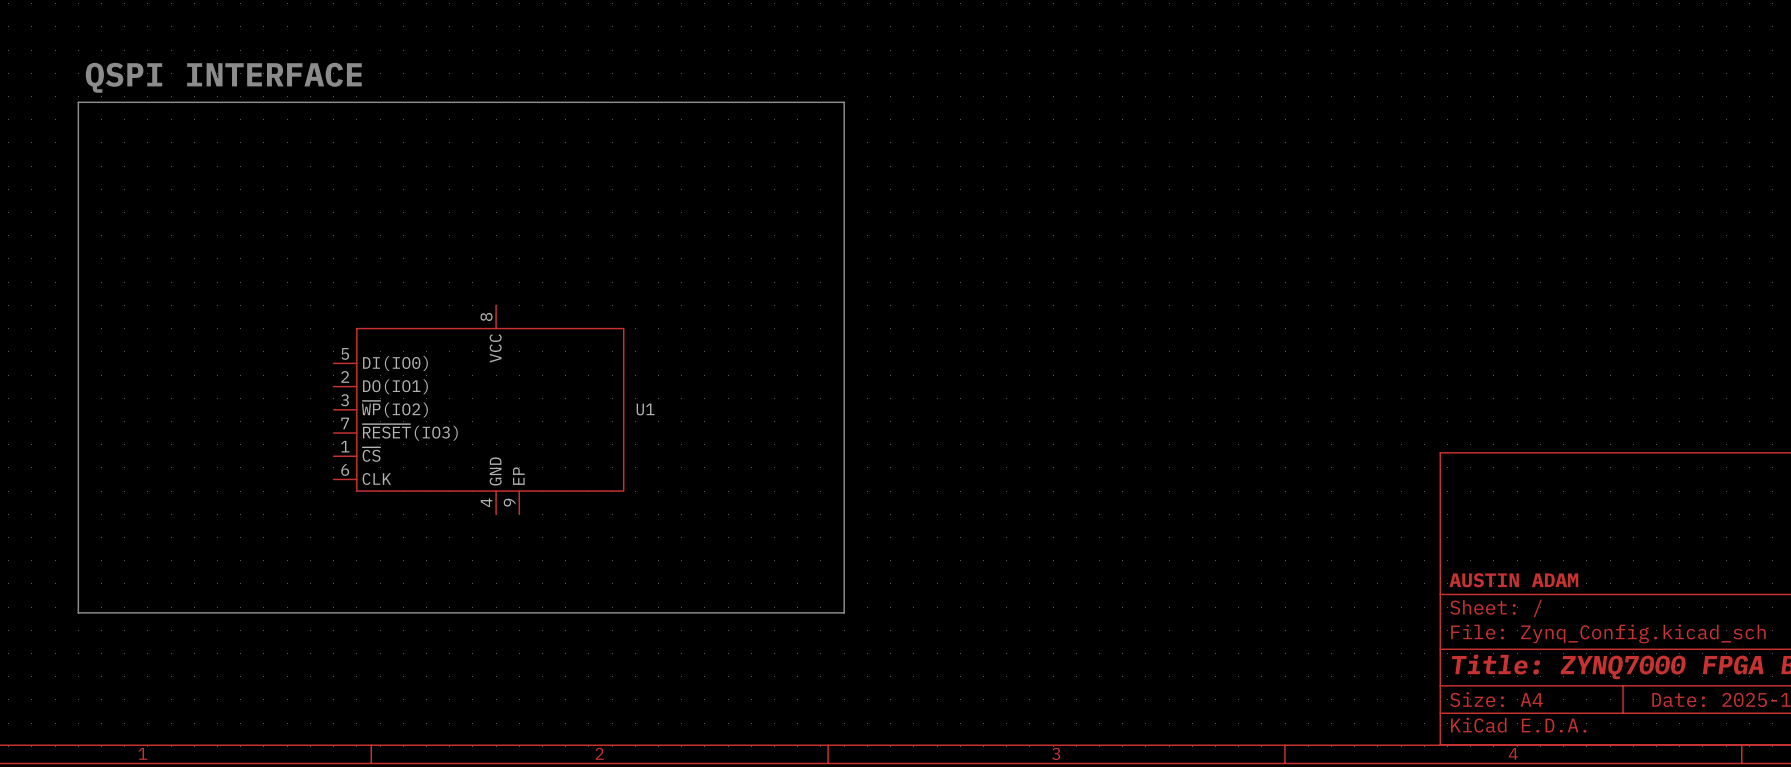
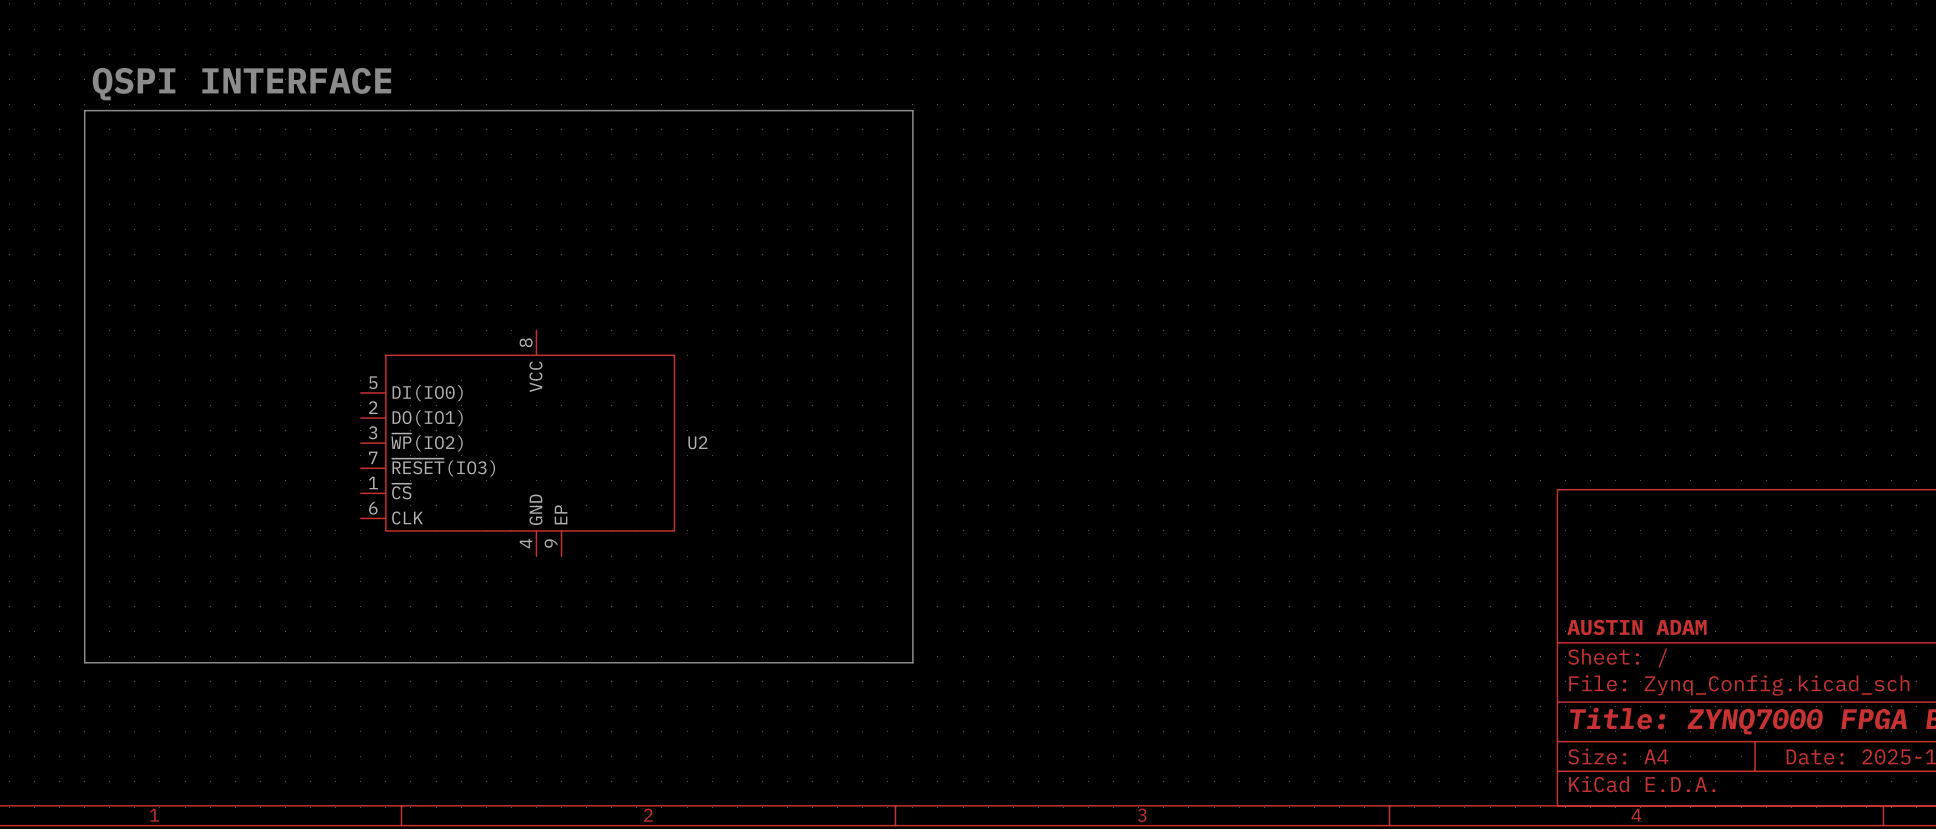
U1 name: U1 (645, 409) -> U2 (697, 442)

